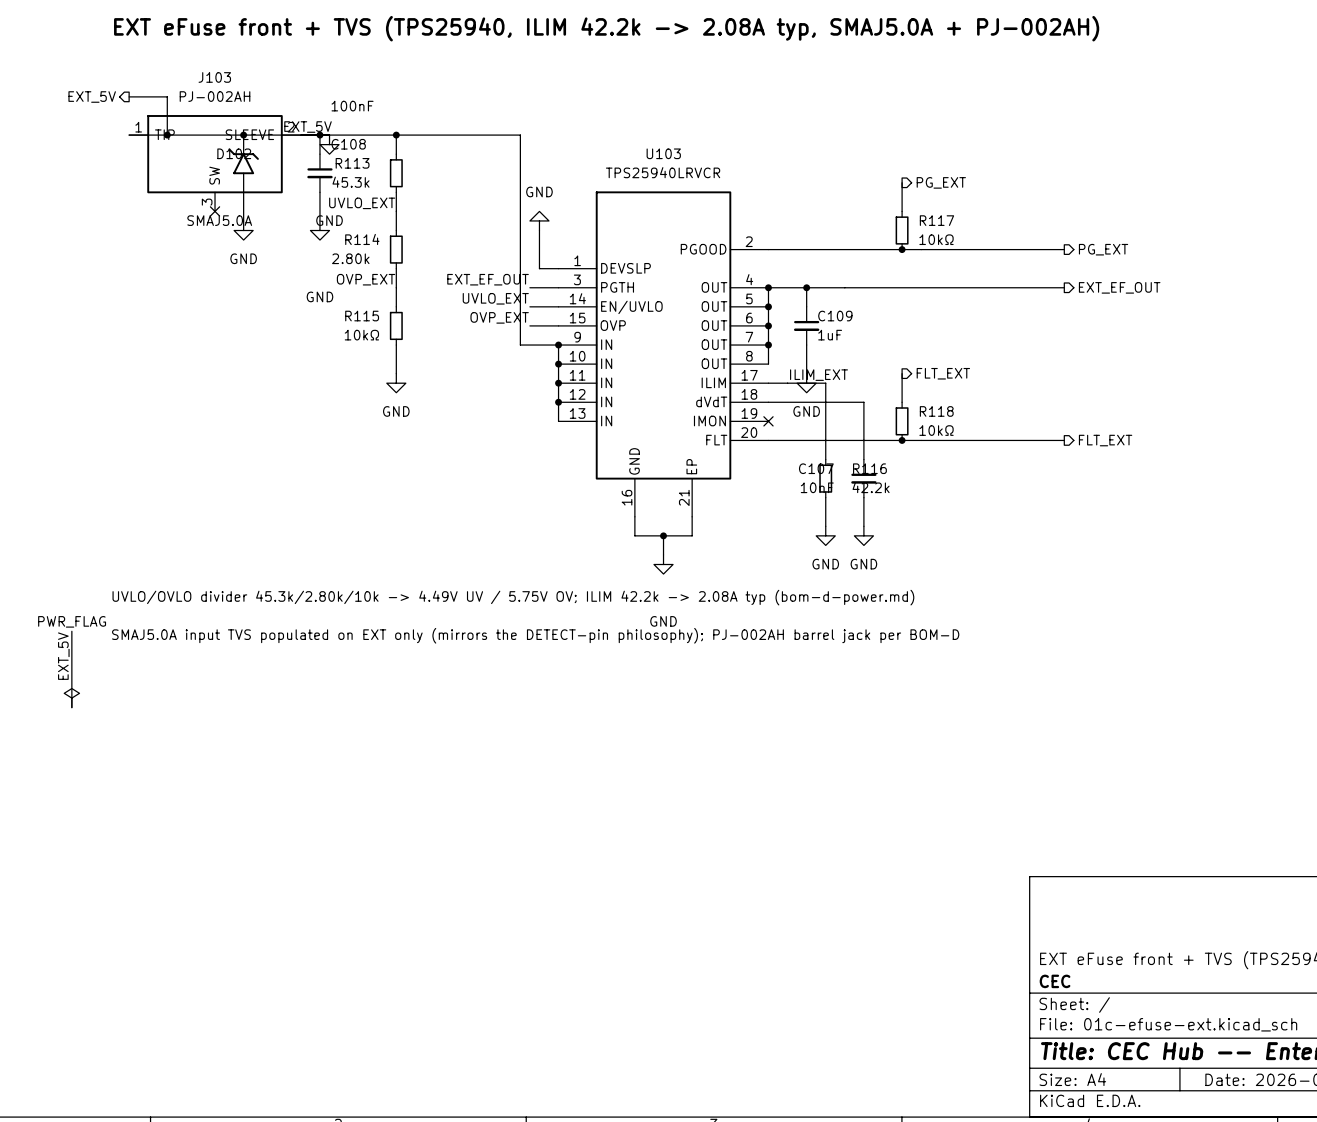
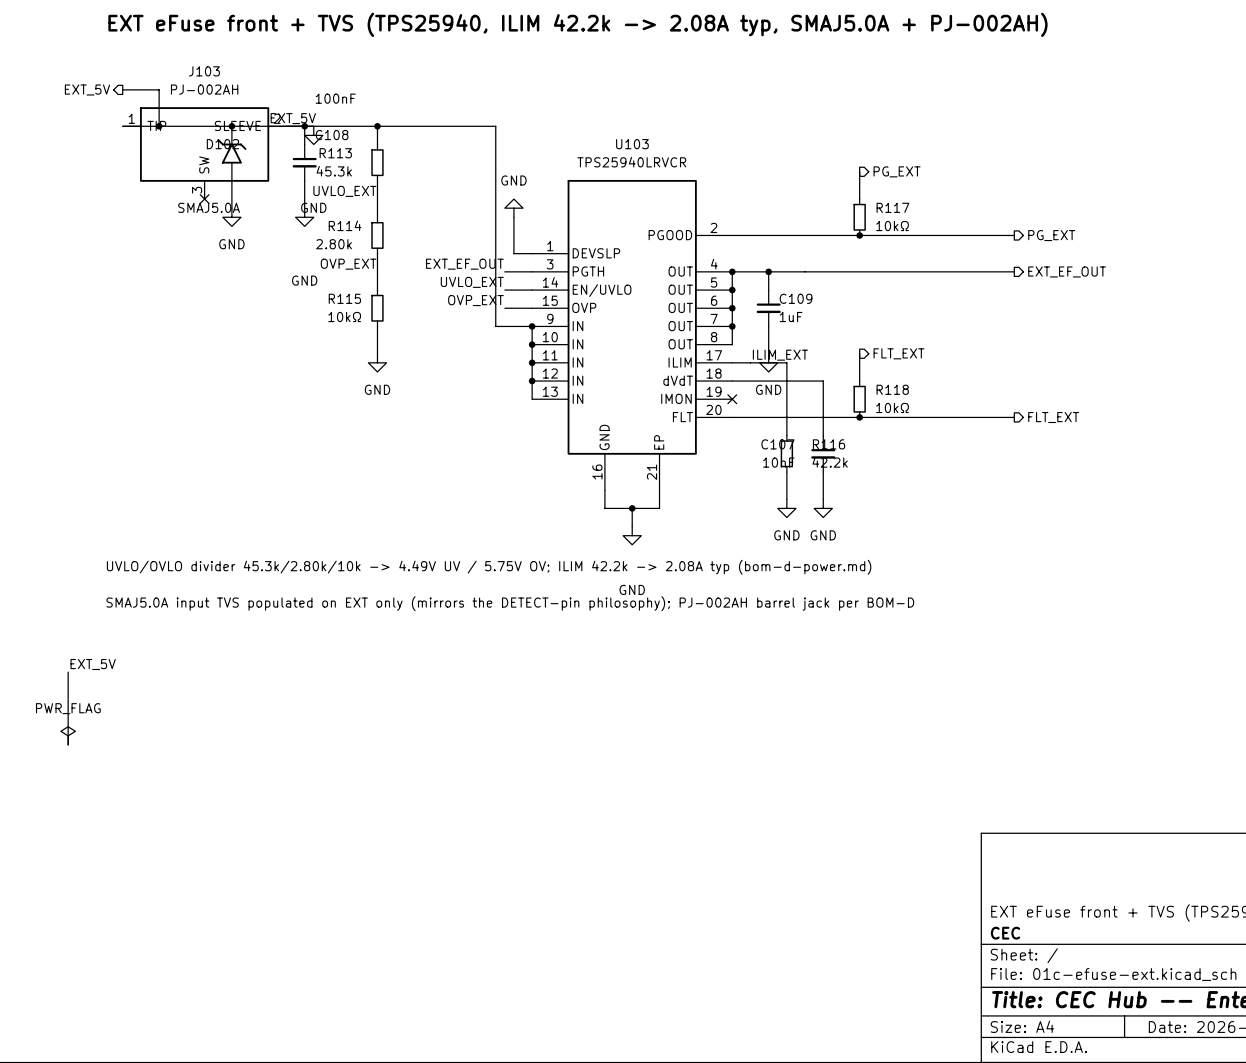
power symbol text position: PWR_FLAG (72, 621) -> PWR_FLAG (68, 708)
wire: (71, 631) (71, 707) -> (68, 744) (68, 672)
label rotation: 0° (63, 656) -> 90° clockwise (93, 664)
power symbol position: PWR_FLAG (71, 698) -> PWR_FLAG (68, 735)

